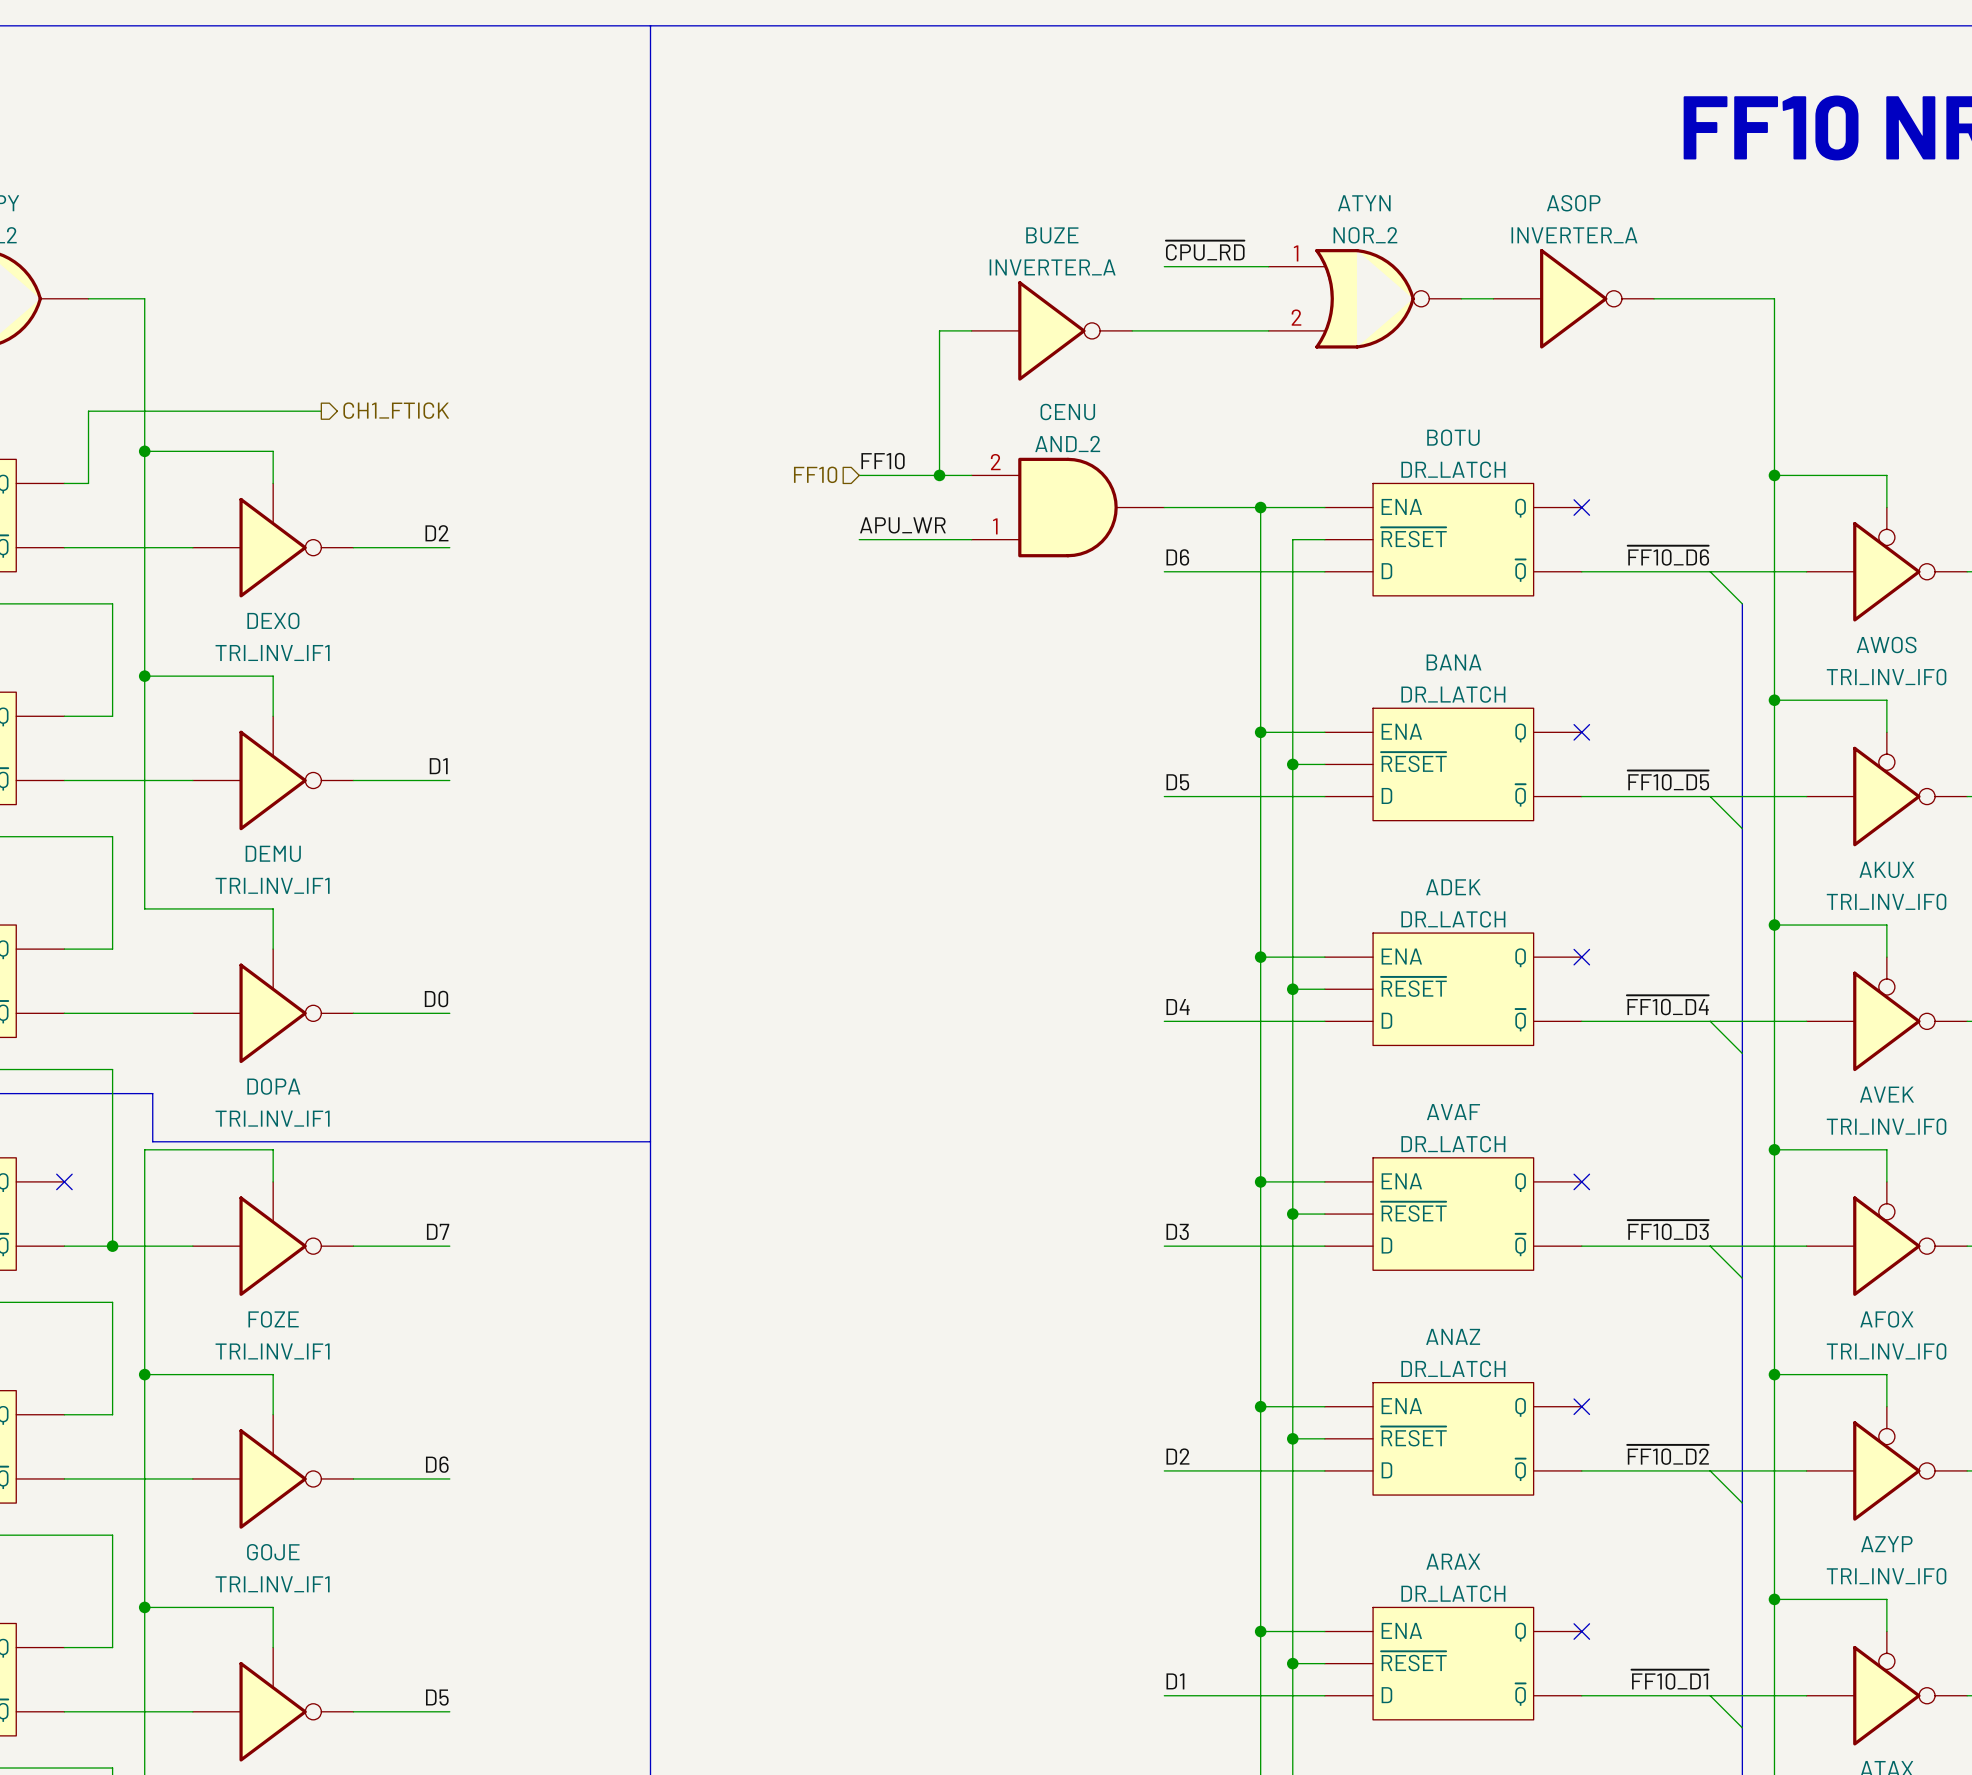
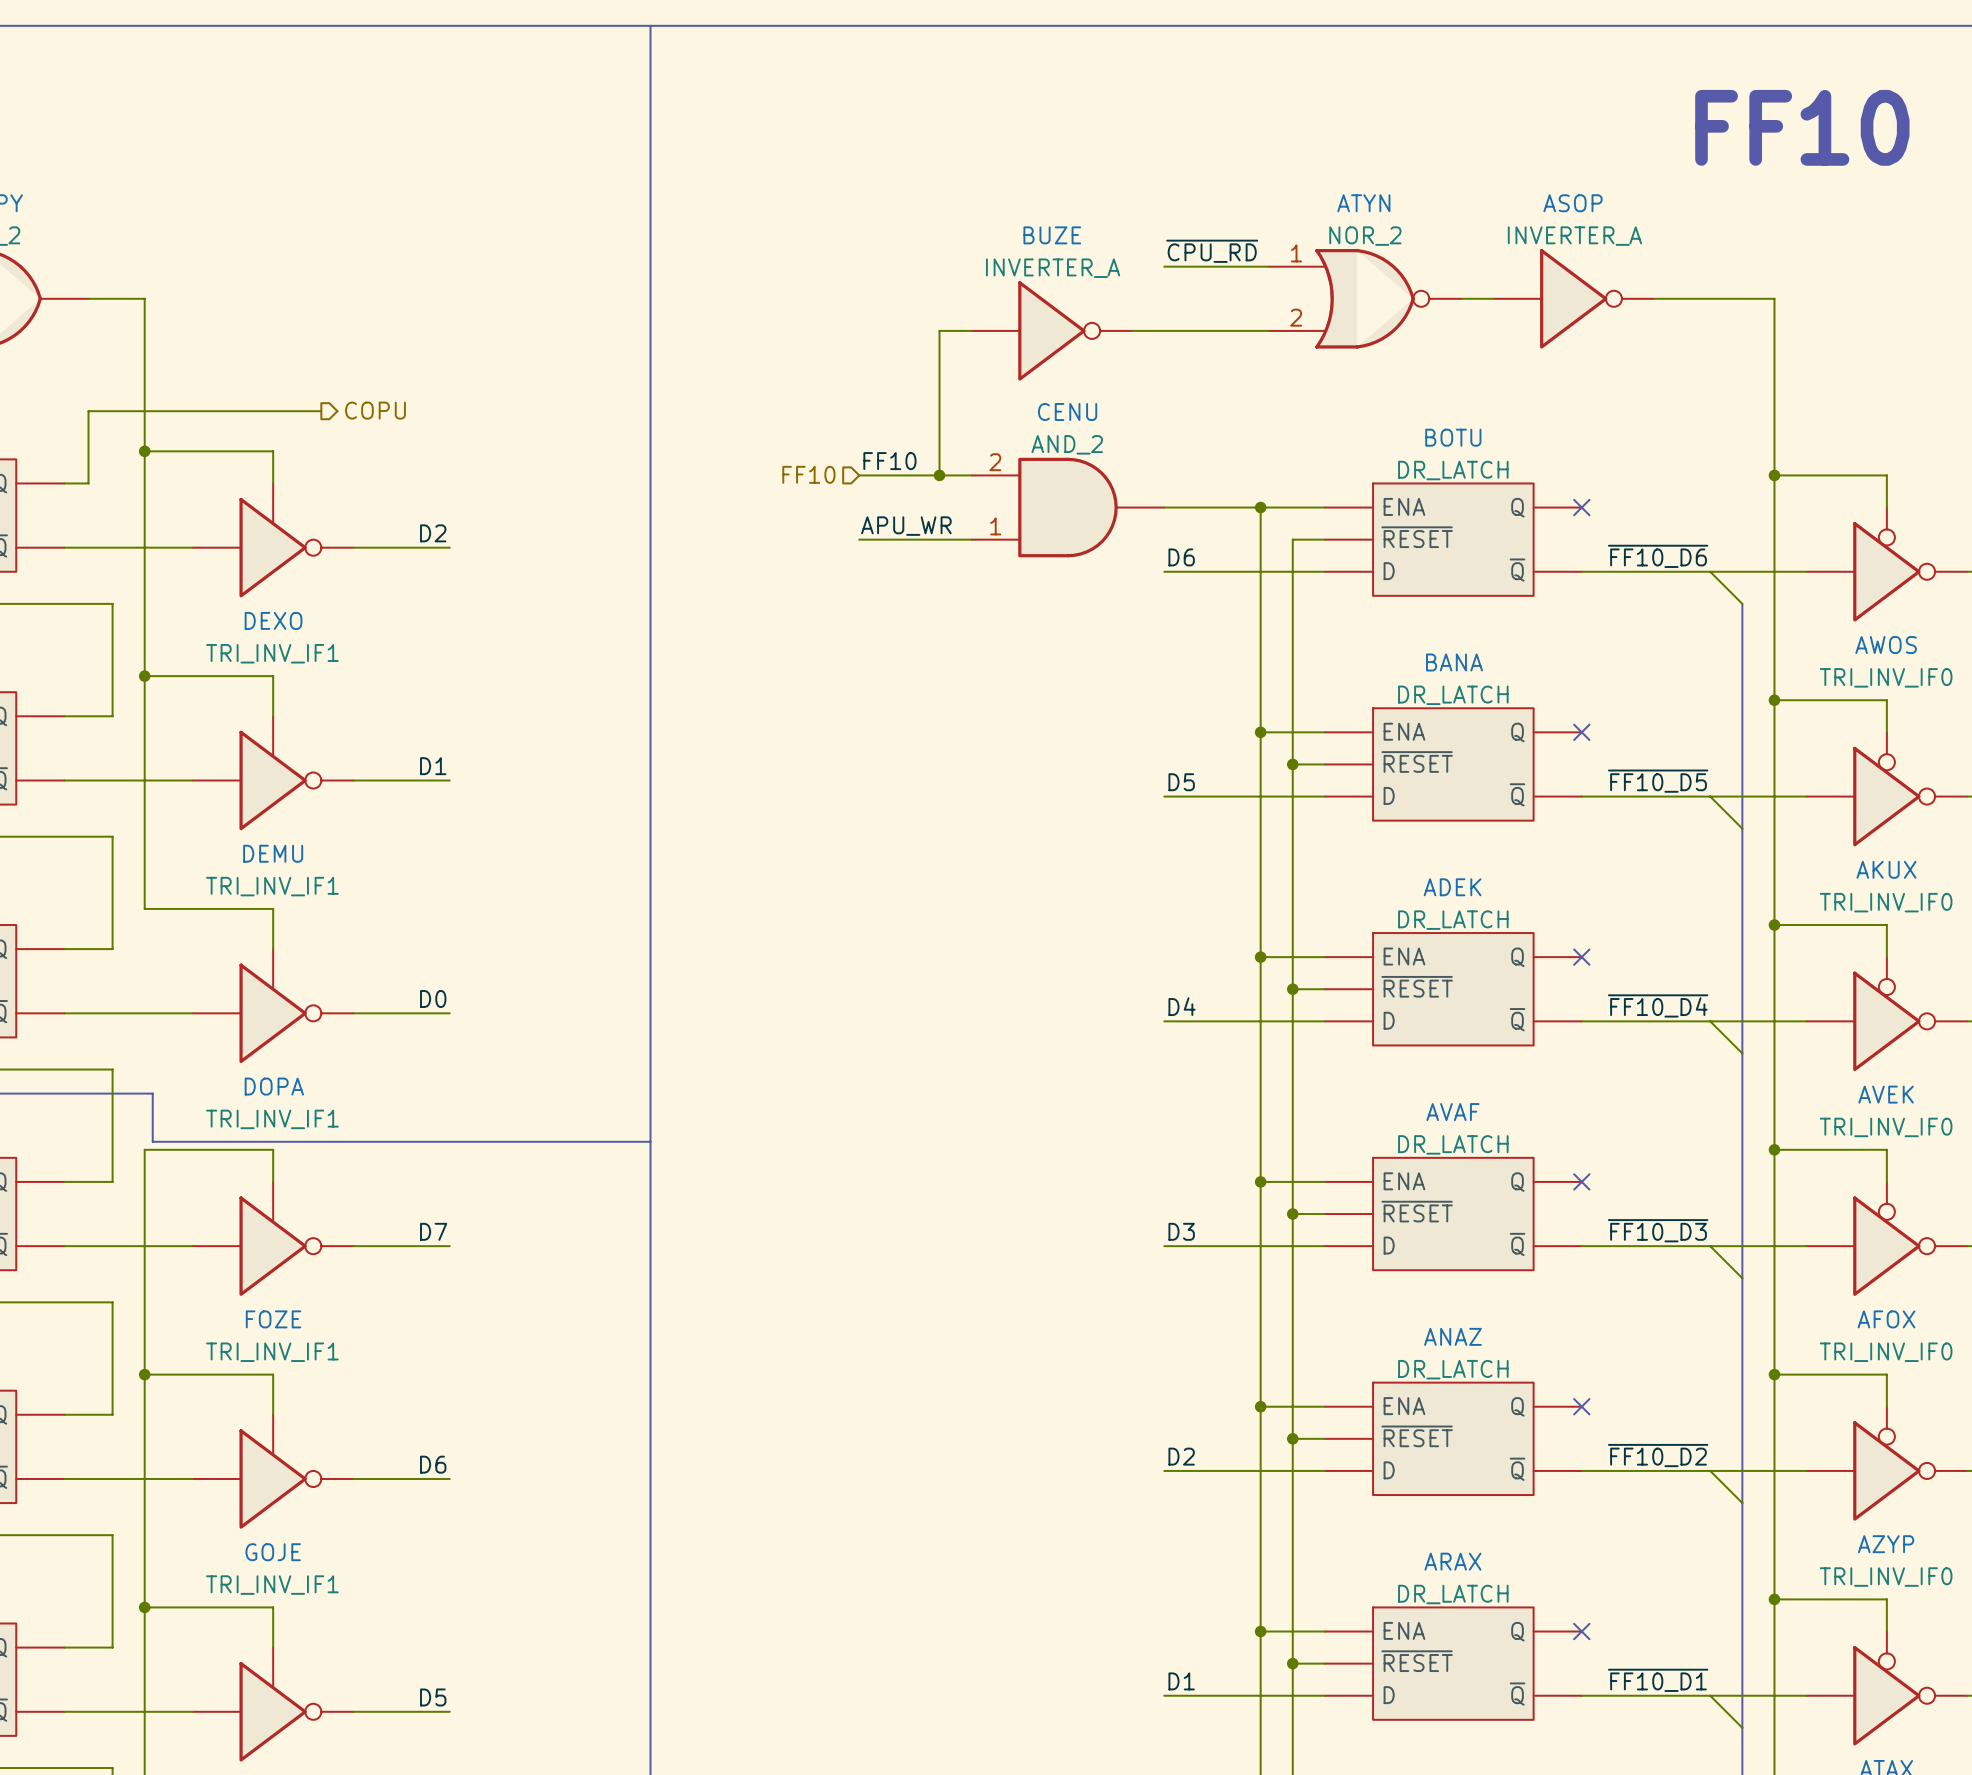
hierarchical label: CH1_FTICK (396, 410) -> COPU (375, 410)
no-connect mark: (64, 1181) -> none
wire: (112, 1181) (112, 1246) -> (112, 1181) (64, 1181)
junction: (112, 1246) -> none

